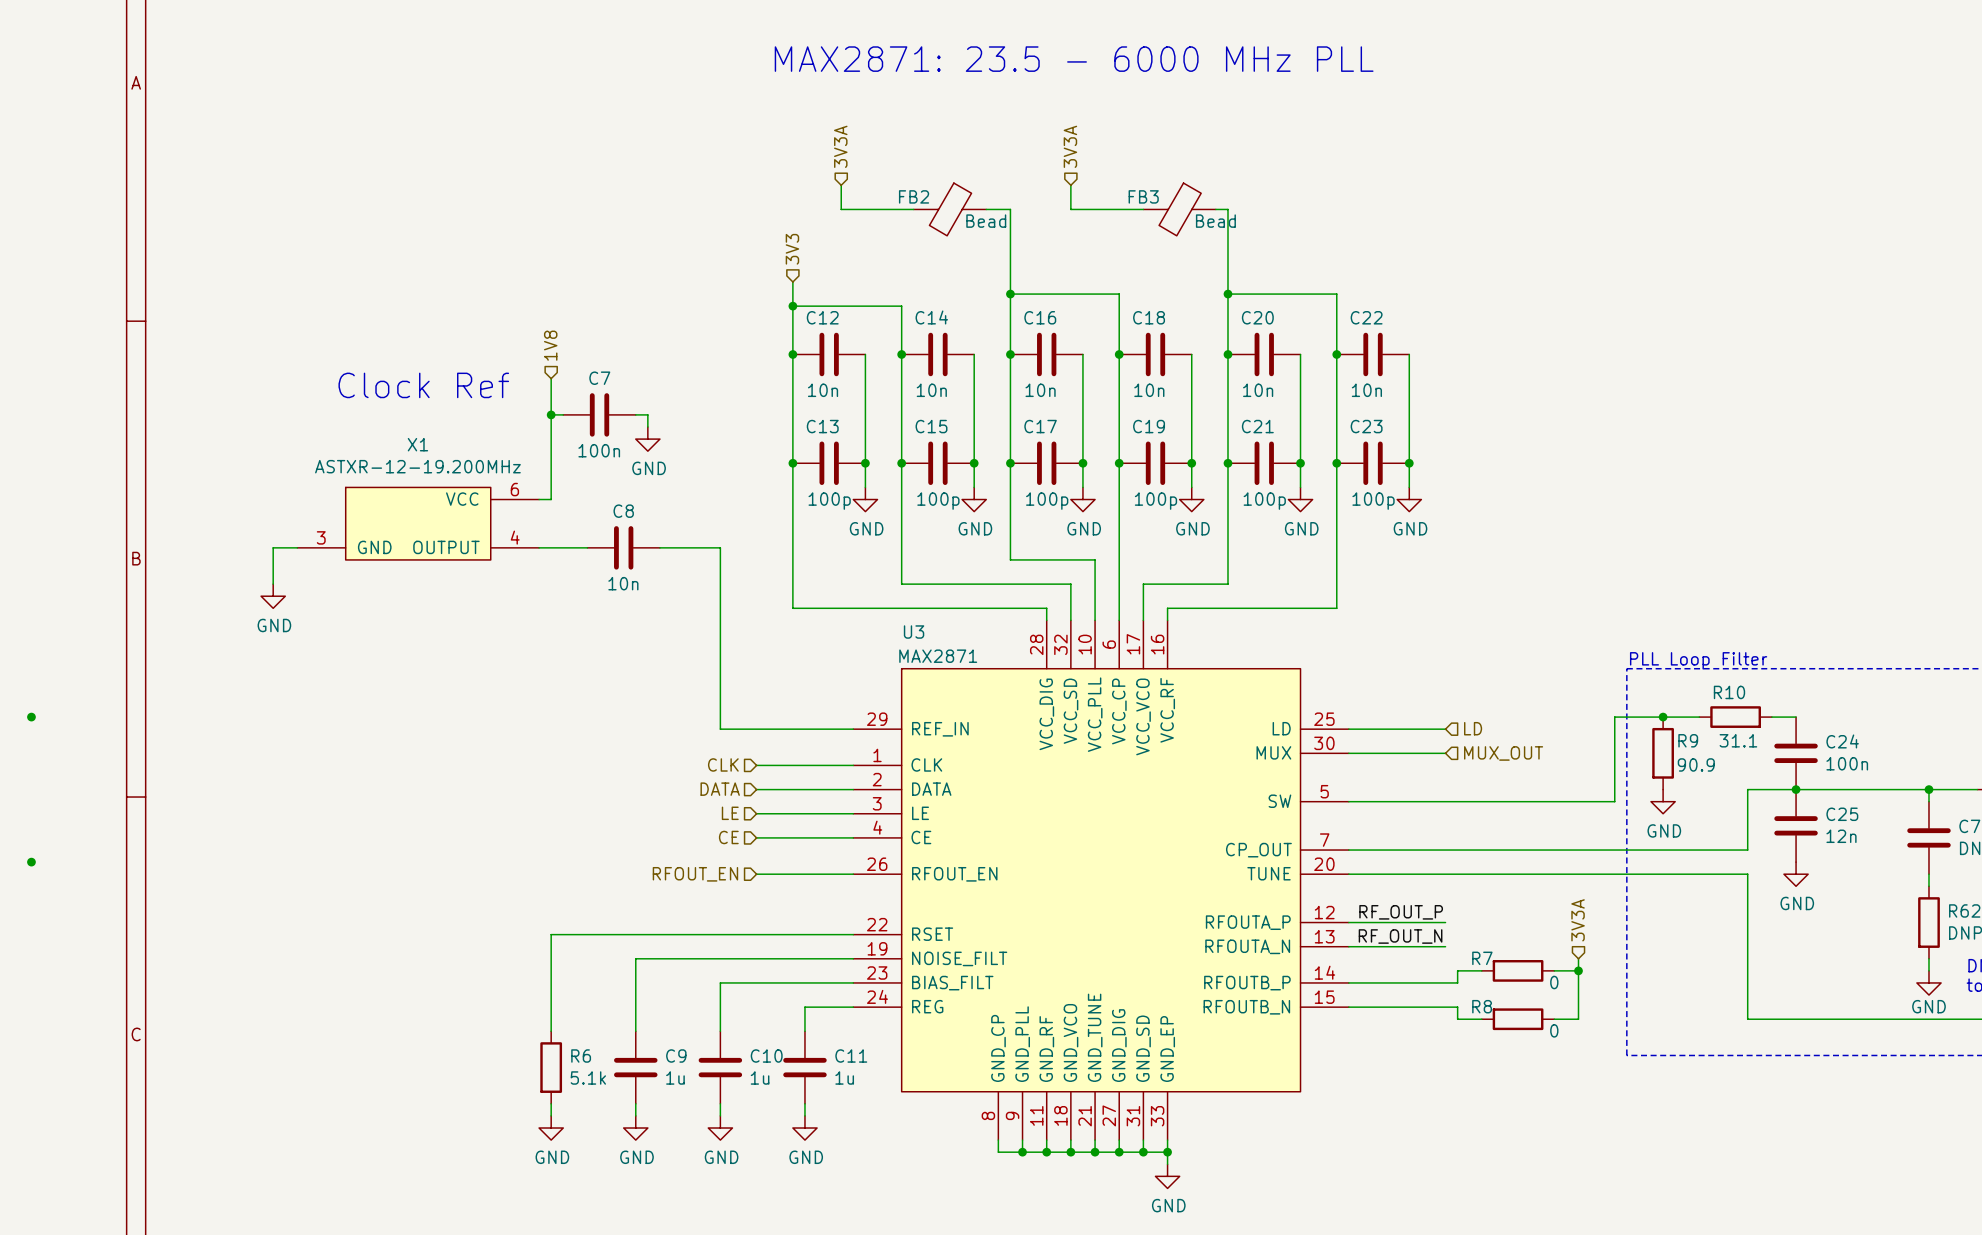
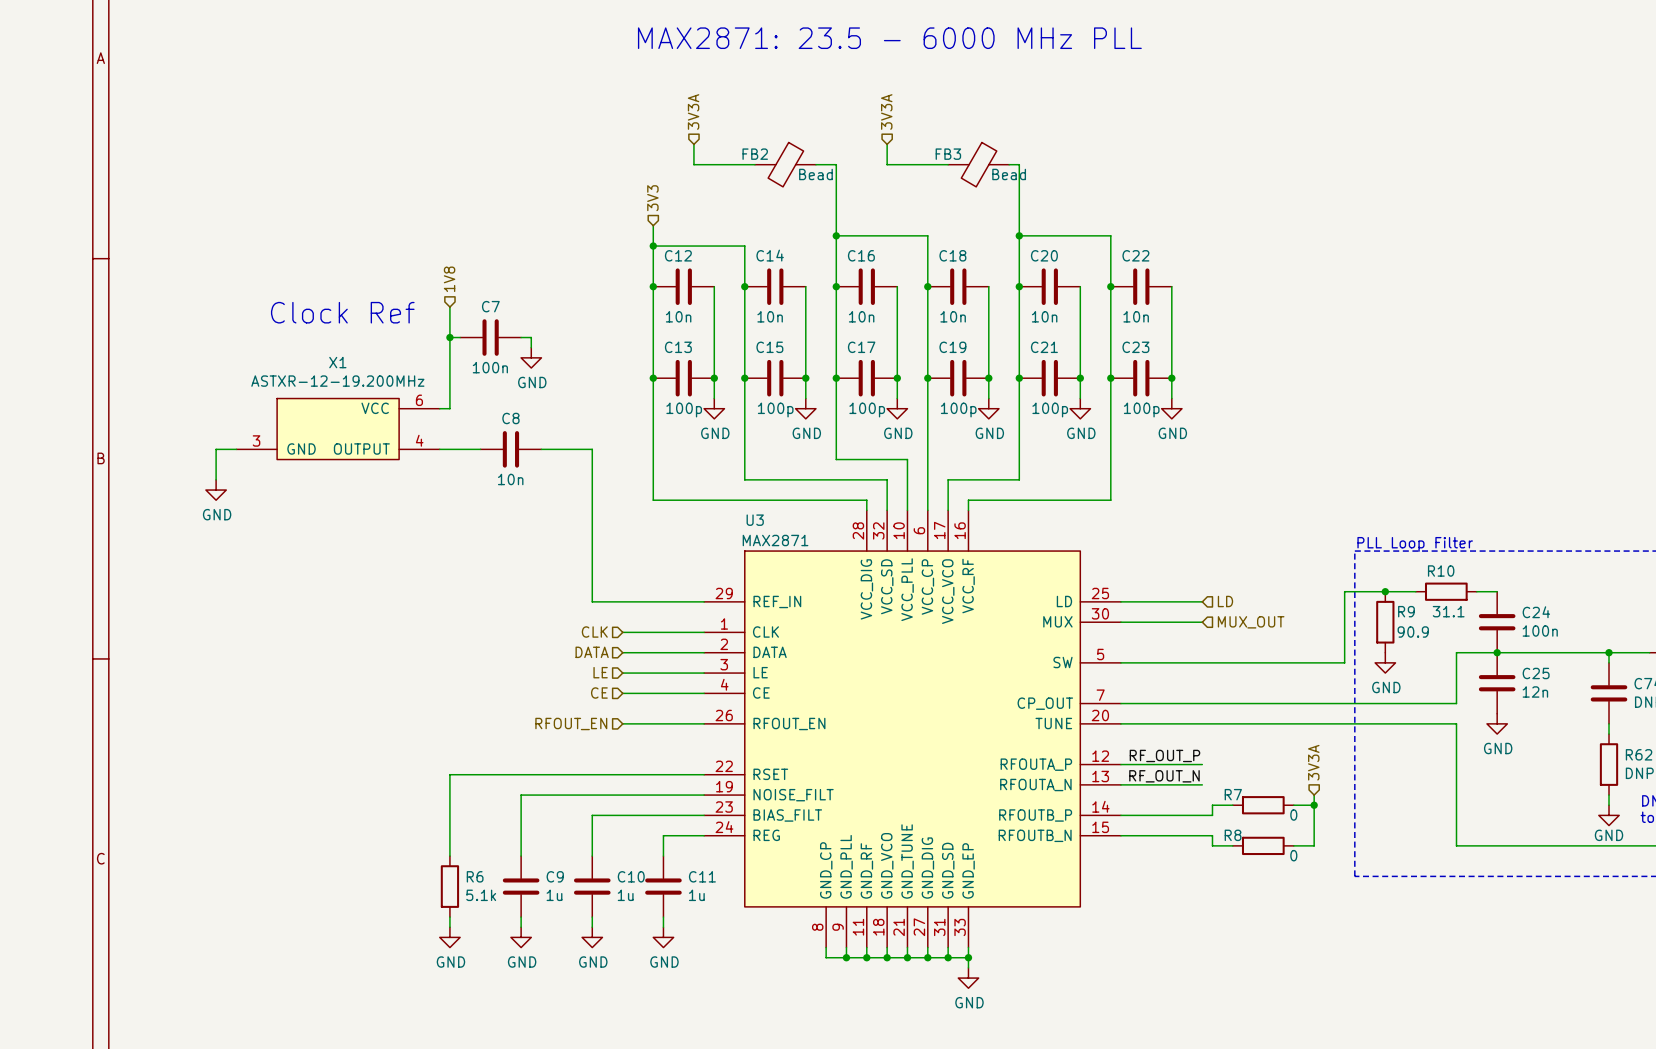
junction: (31, 717) -> none
junction: (31, 862) -> none

